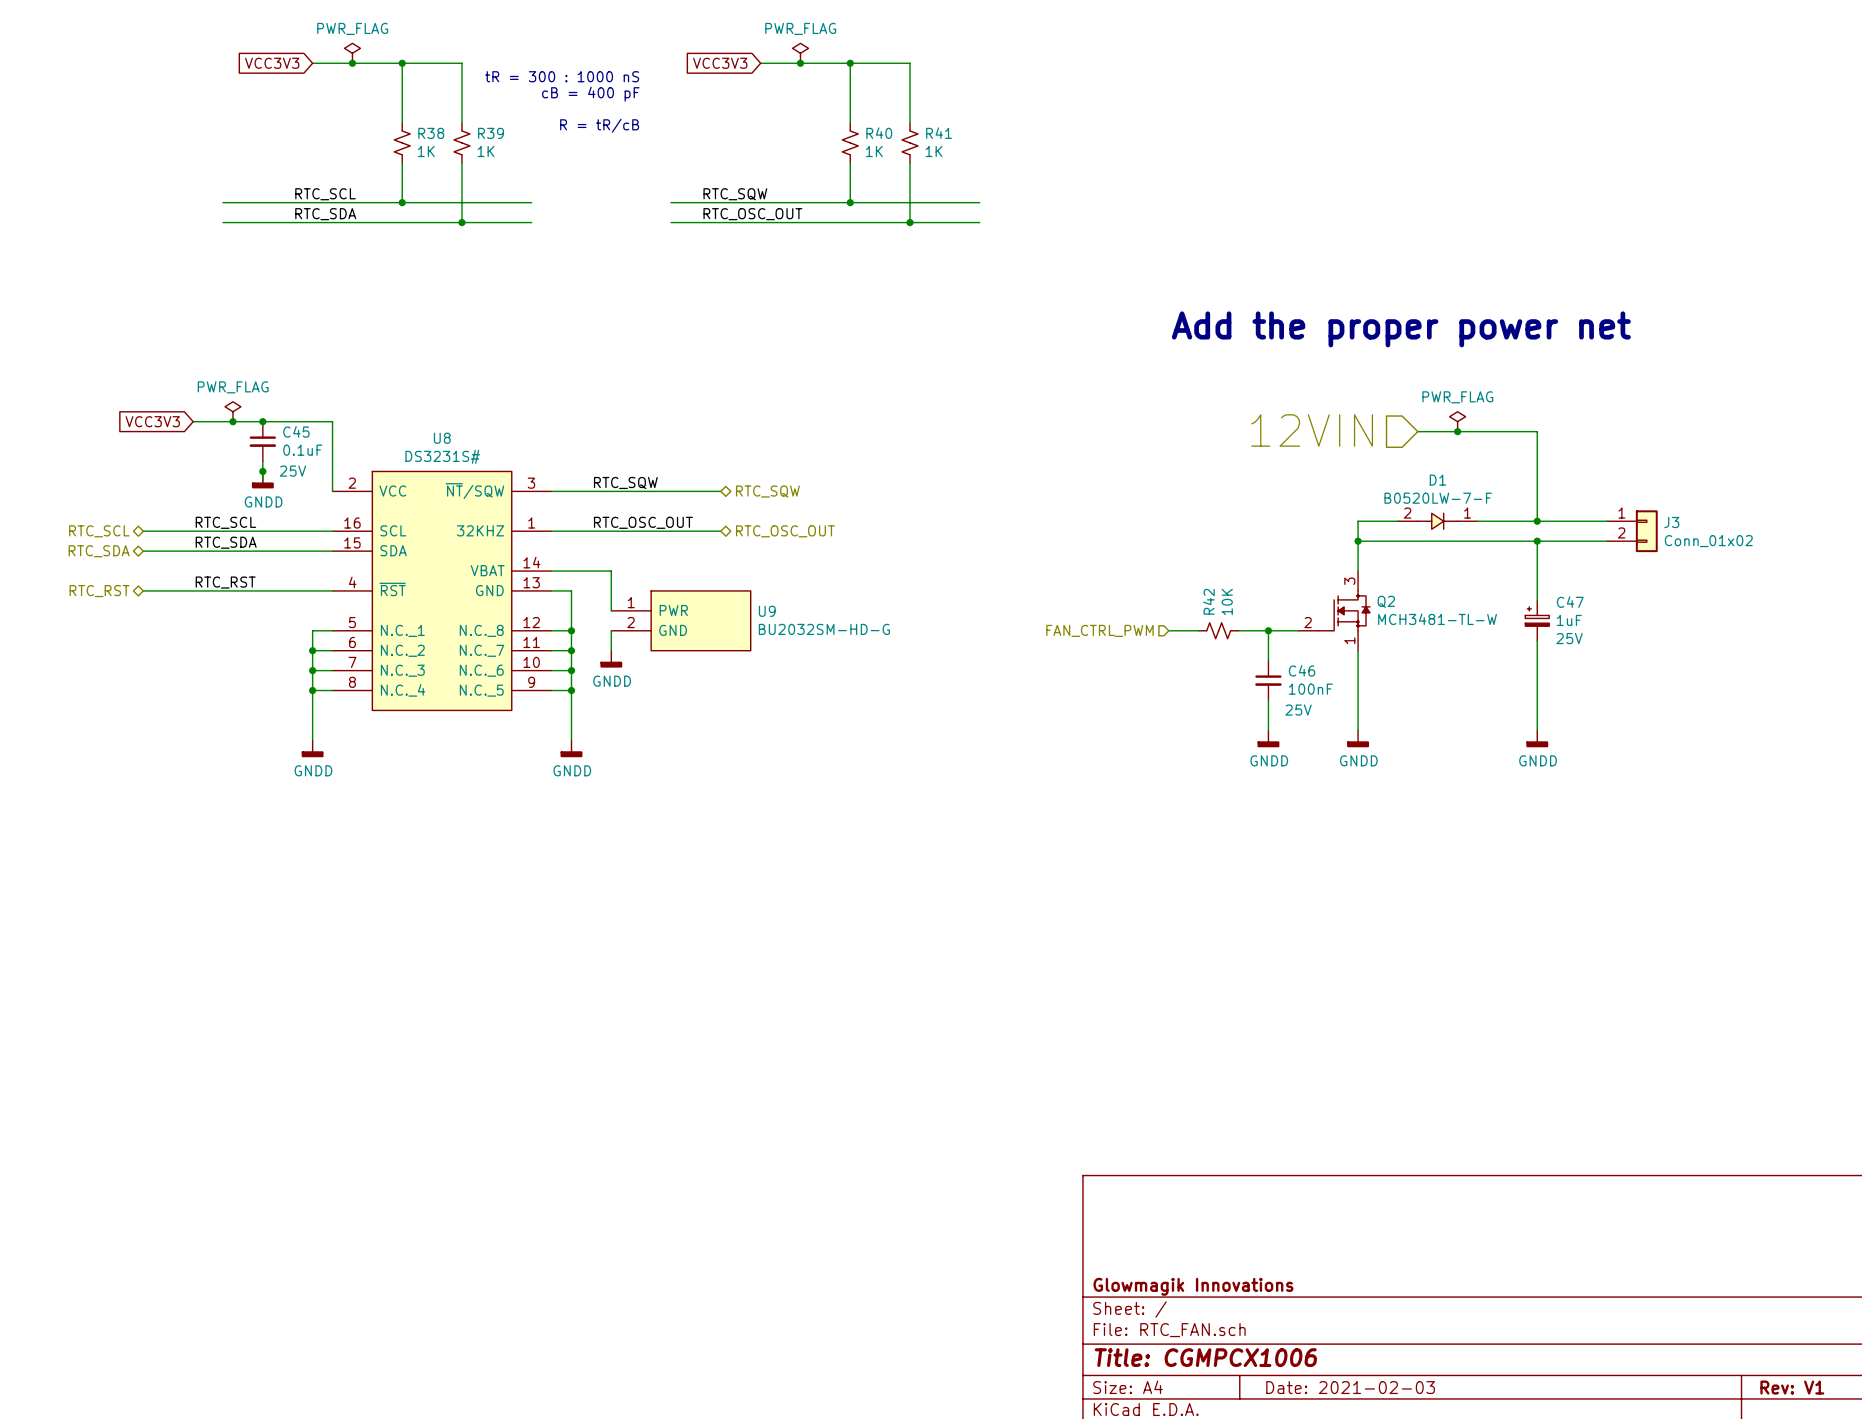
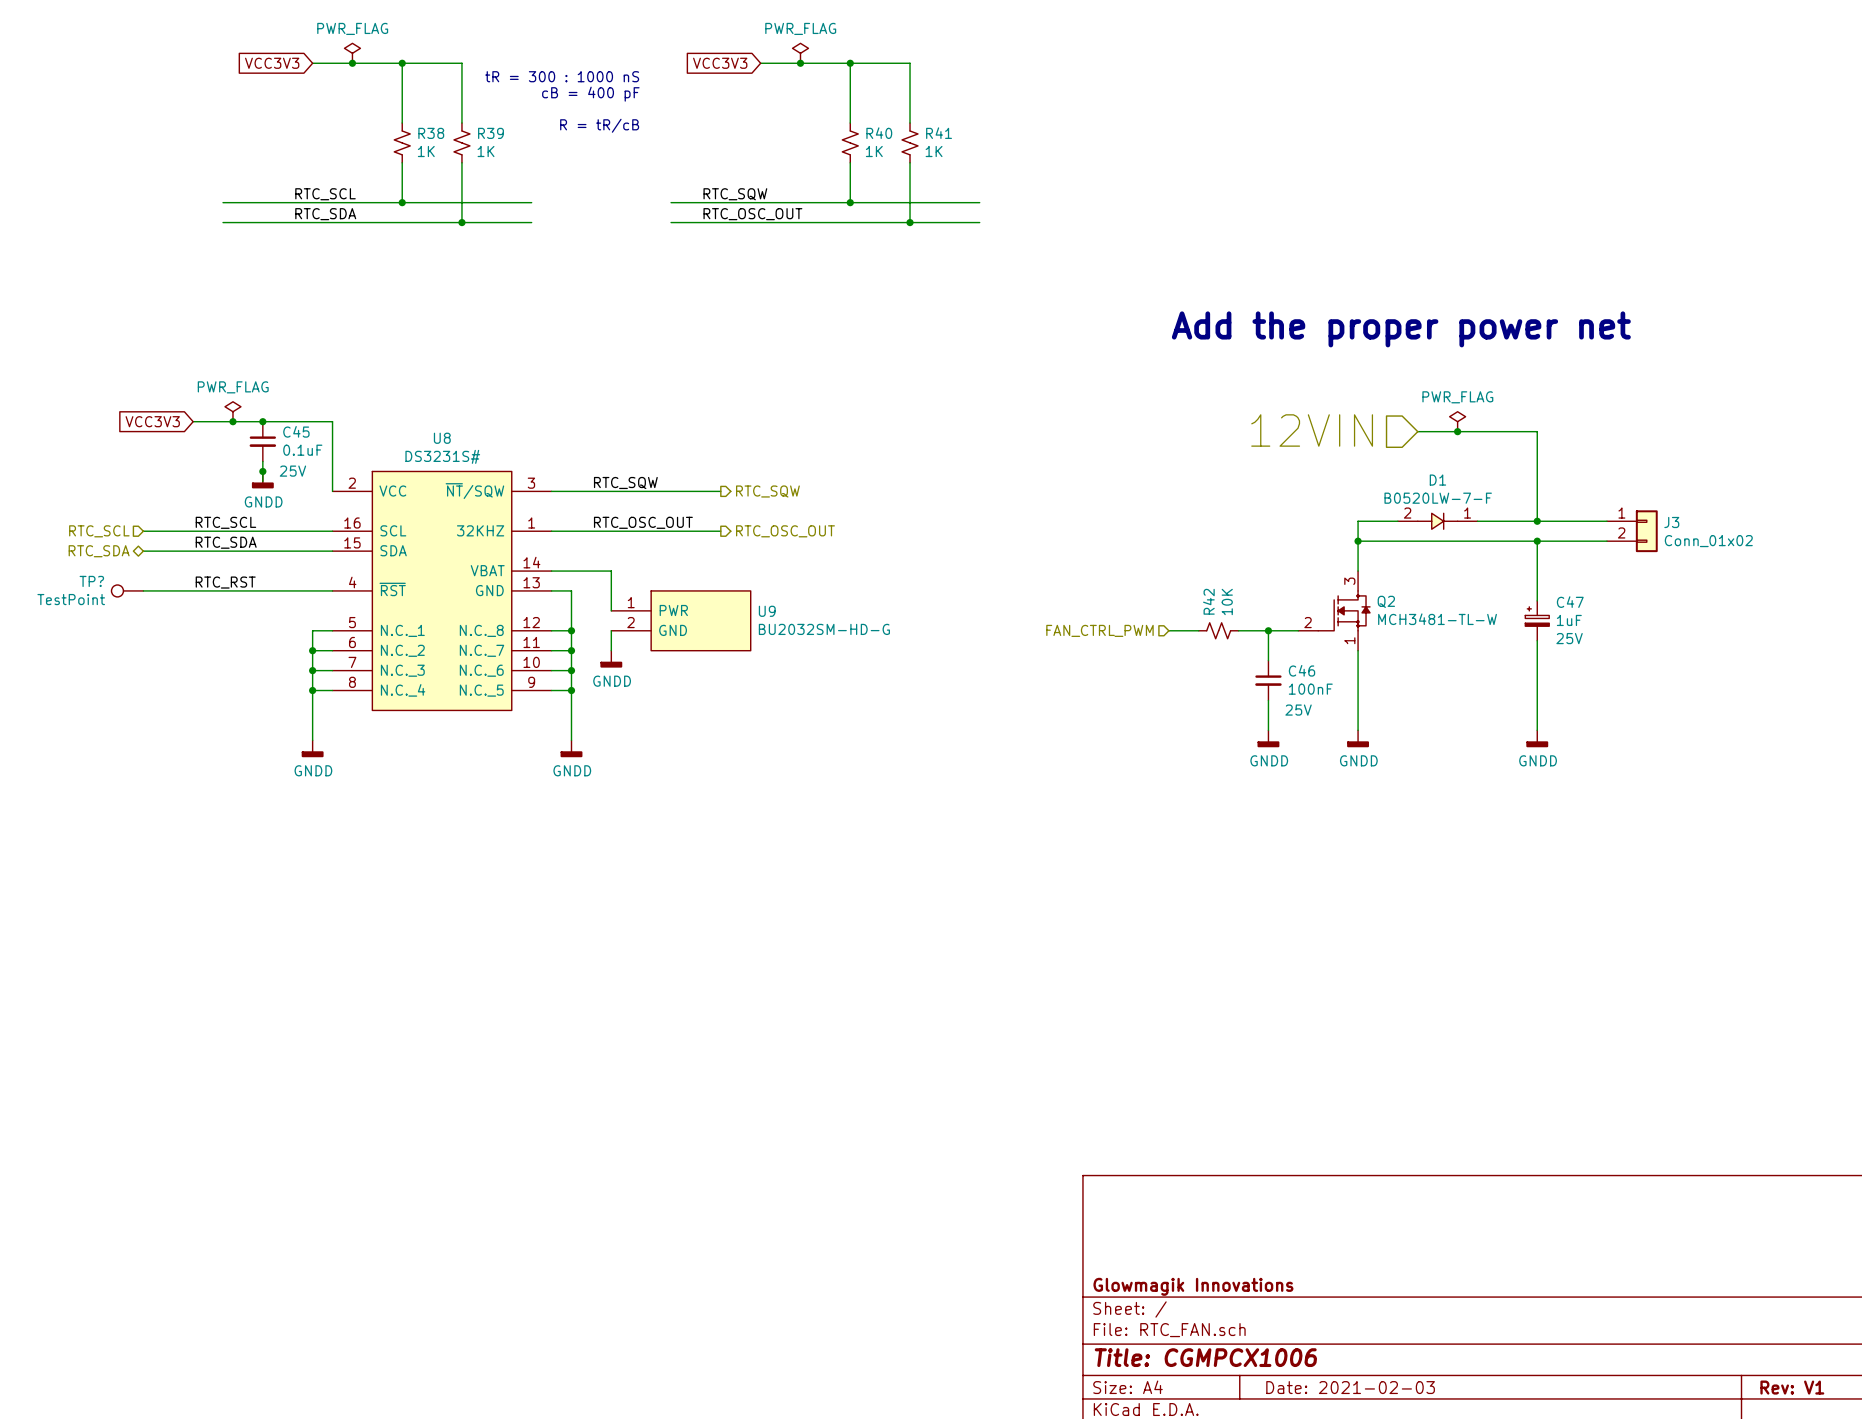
hierarchical label shape: bidirectional (767, 491) -> output (767, 491)
hierarchical label shape: bidirectional (99, 531) -> input (99, 531)
hierarchical label shape: bidirectional (785, 531) -> output (785, 531)
TP?: none -> TestPoint (127, 590)
hierarchical label: RTC_RST (99, 591) -> none

